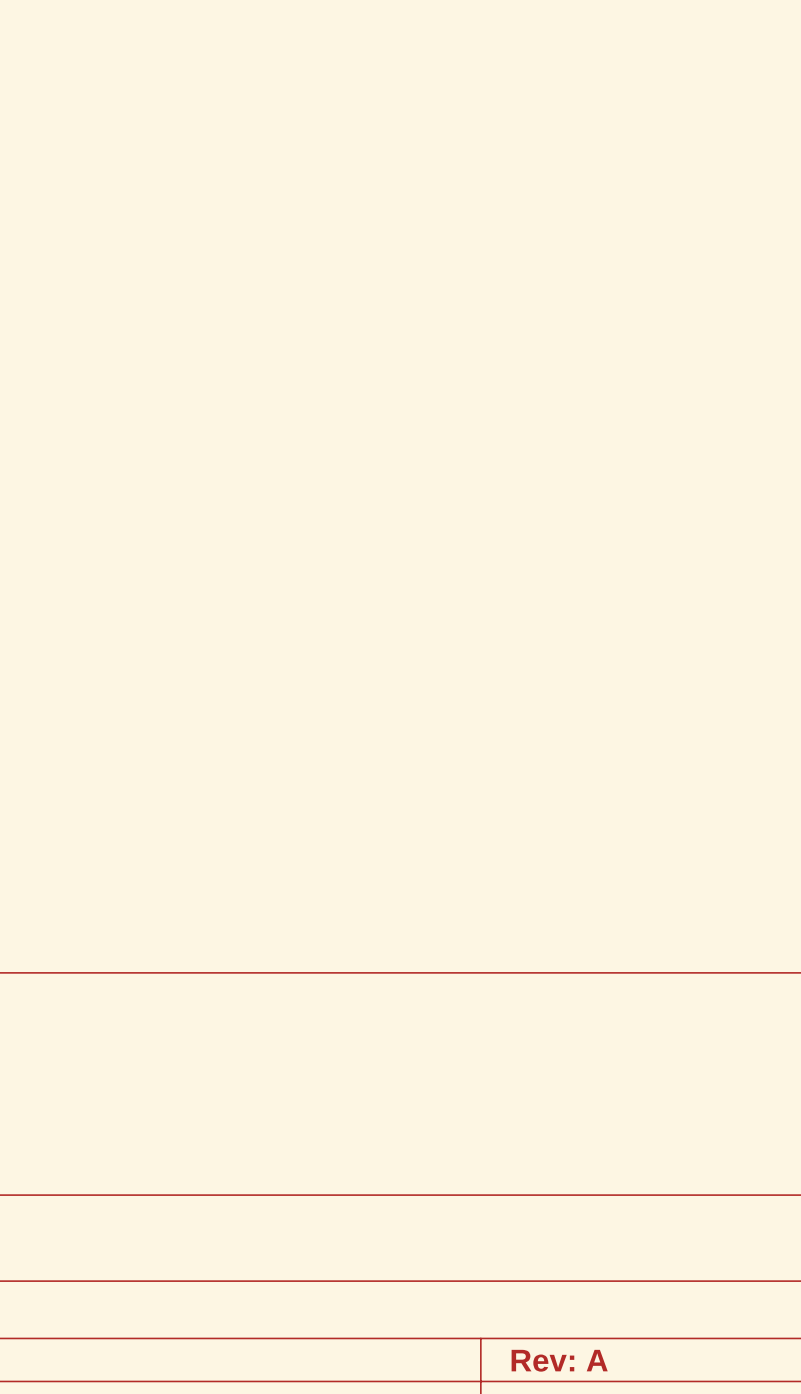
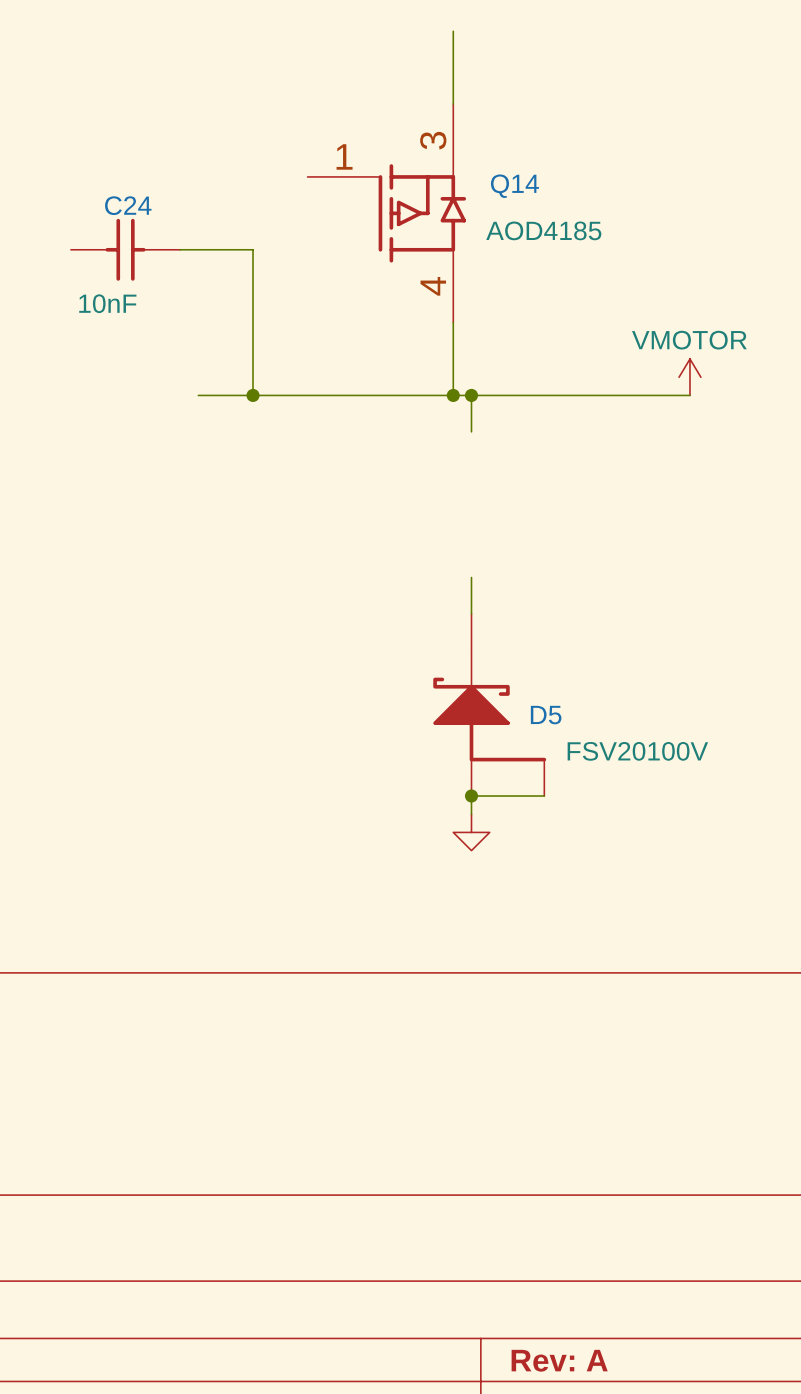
wire: none -> (453, 31) (453, 104)
Q14: none -> AOD4185 (386, 213)
C24: none -> (125, 249)
wire: none -> (180, 249) (253, 249) (253, 395)
wire: none -> (453, 322) (453, 395)
power symbol: none -> VMOTOR (689, 377)
wire: none -> (198, 395) (689, 395)
junction: none -> (253, 395)
junction: none -> (453, 395)
wire: none -> (471, 395) (471, 431)
junction: none -> (471, 395)
wire: none -> (471, 577) (471, 613)
D5: none -> FSV20100V (489, 704)
junction: none -> (471, 796)
wire: none -> (544, 796) (471, 796) (471, 814)
power symbol: none -> (471, 832)

